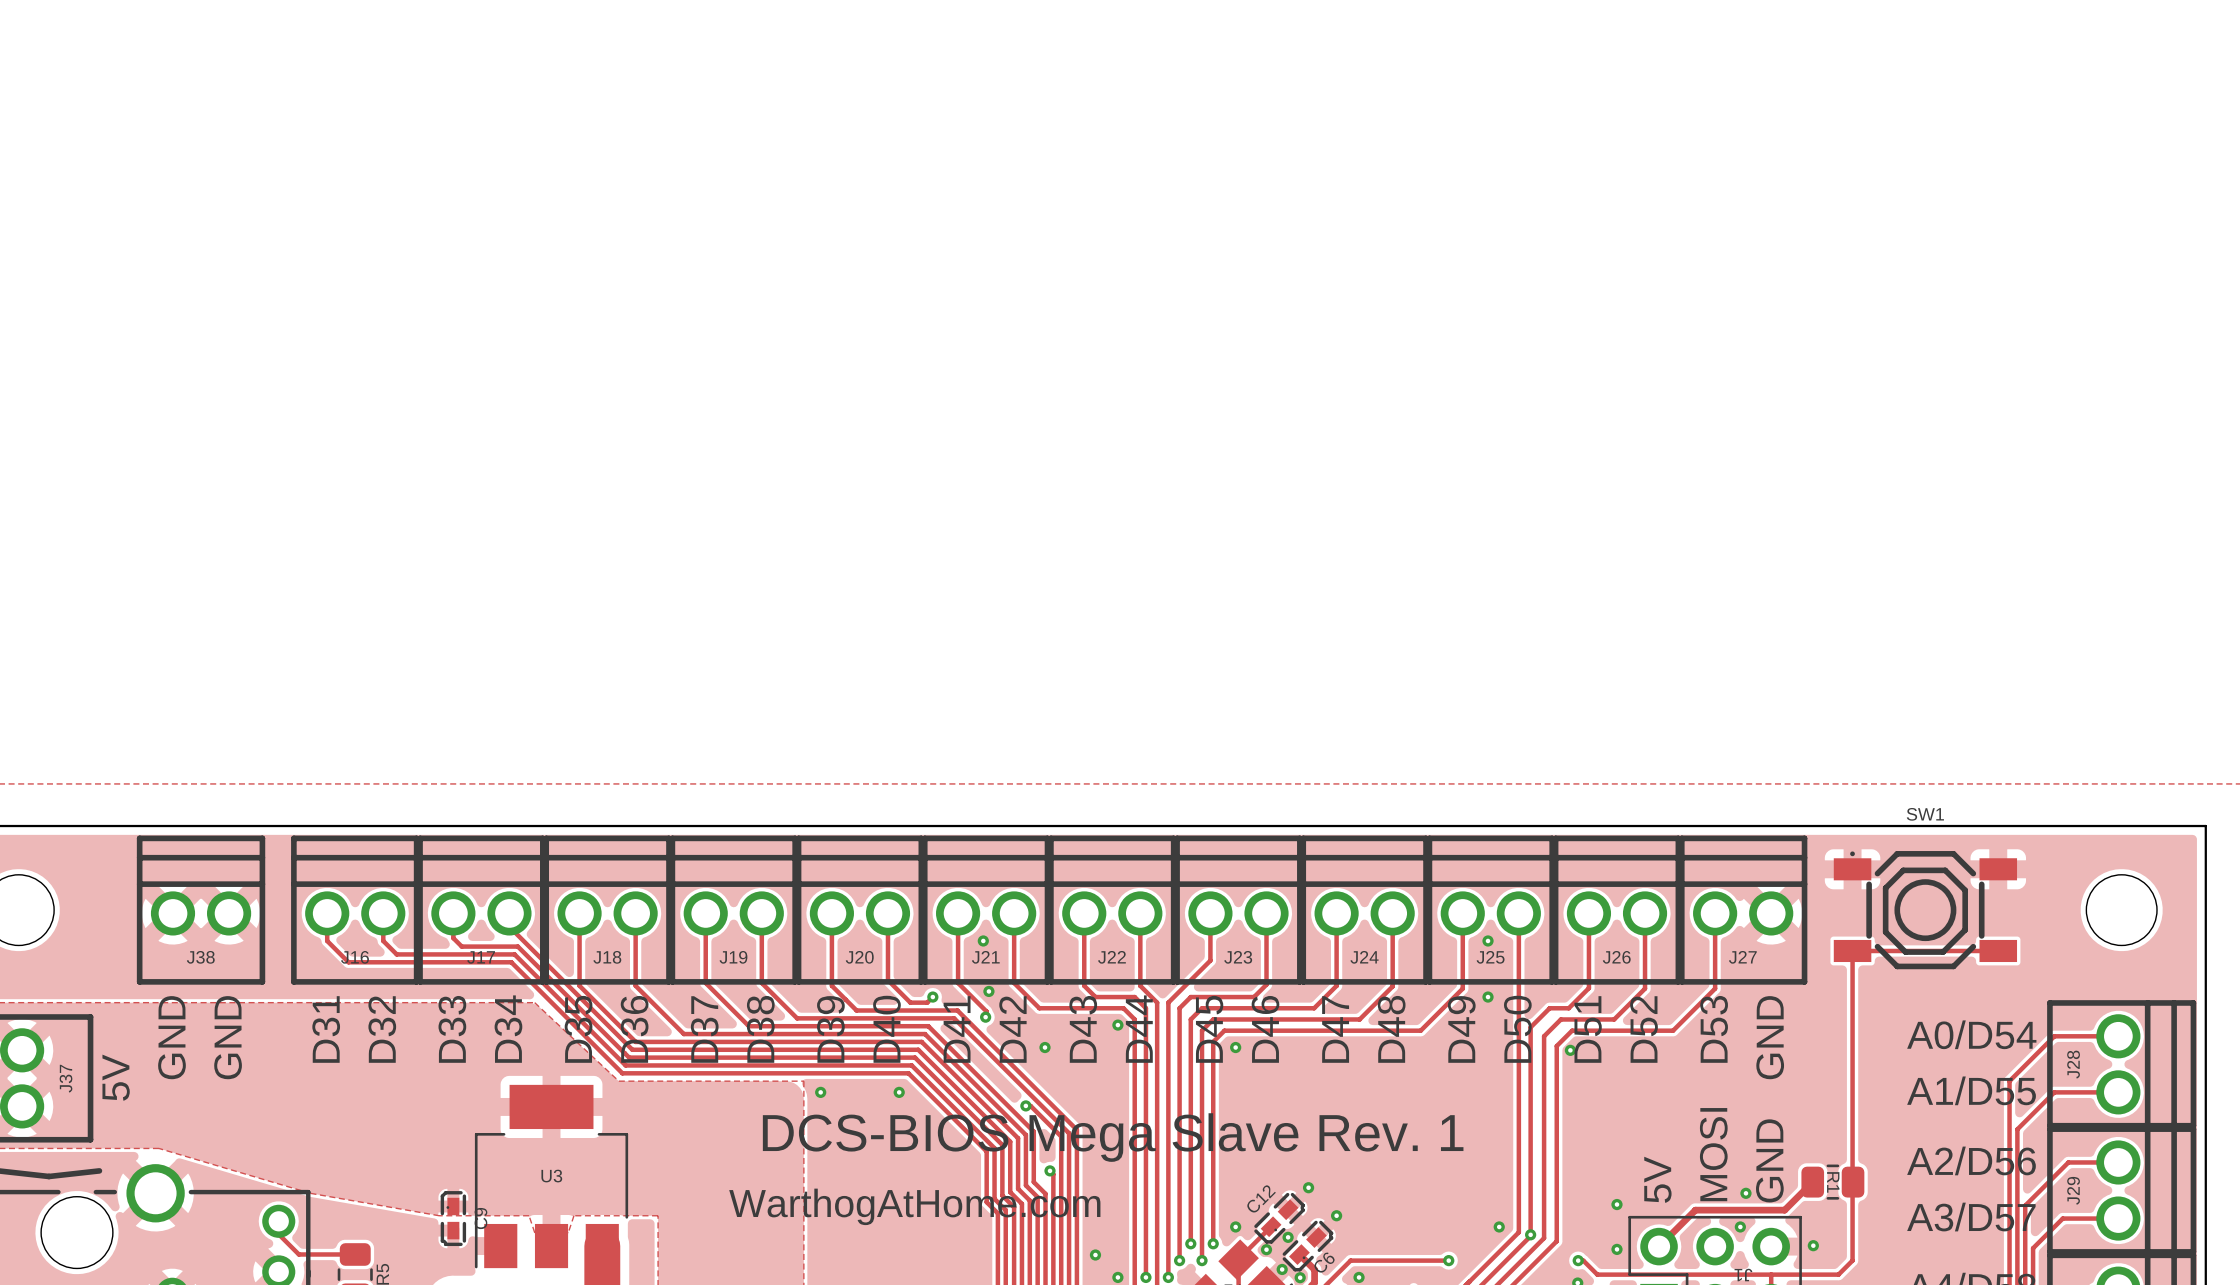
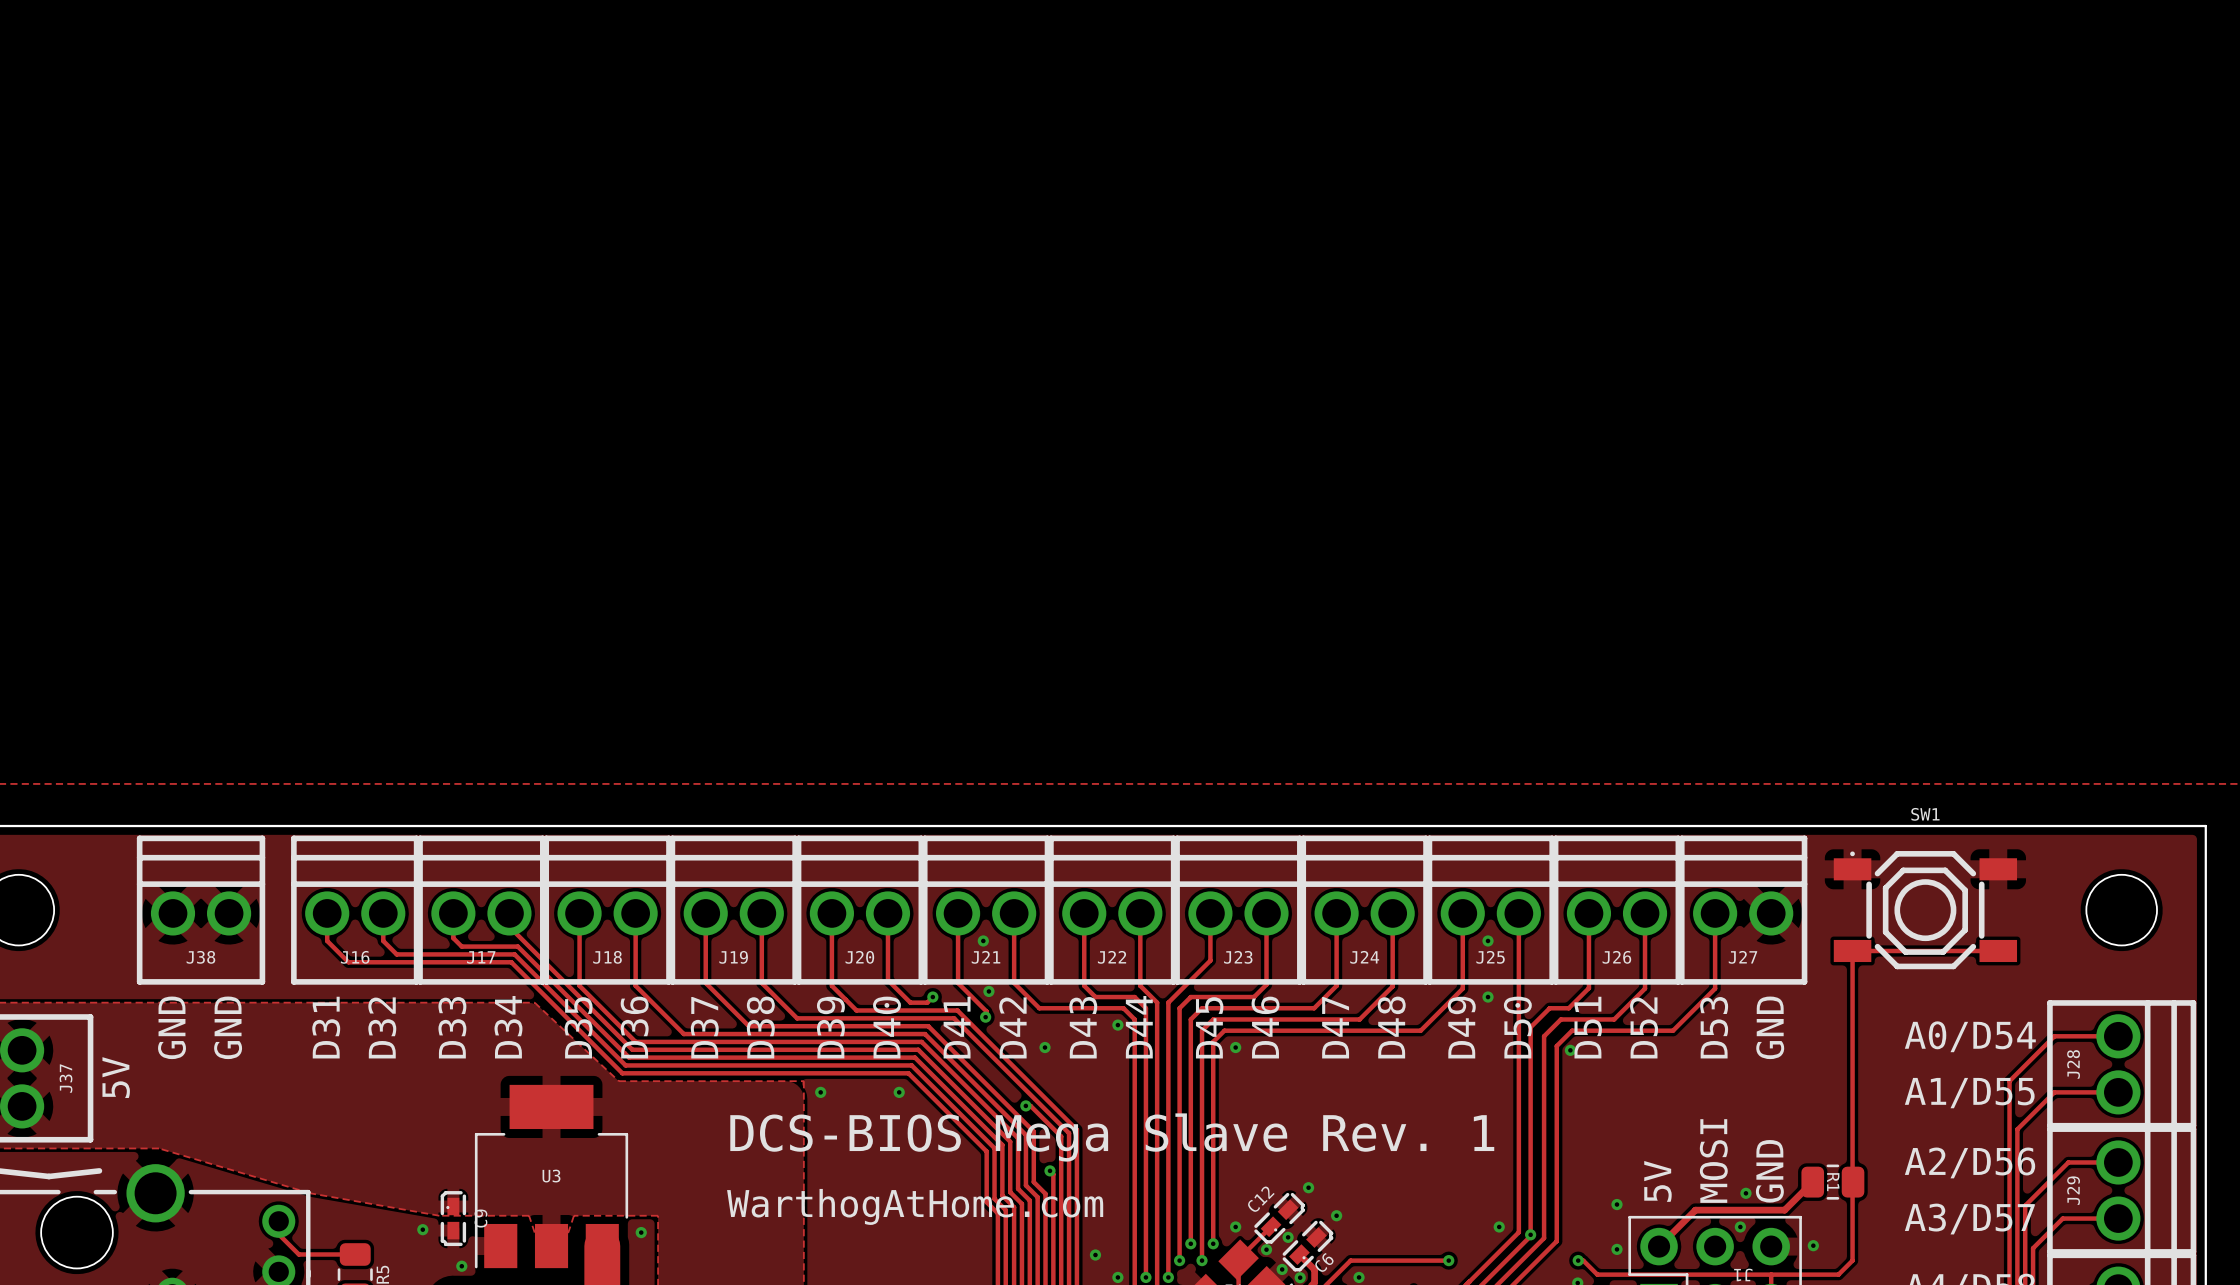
via: none -> (422, 1229)
via: none -> (641, 1232)
via: none -> (461, 1266)

